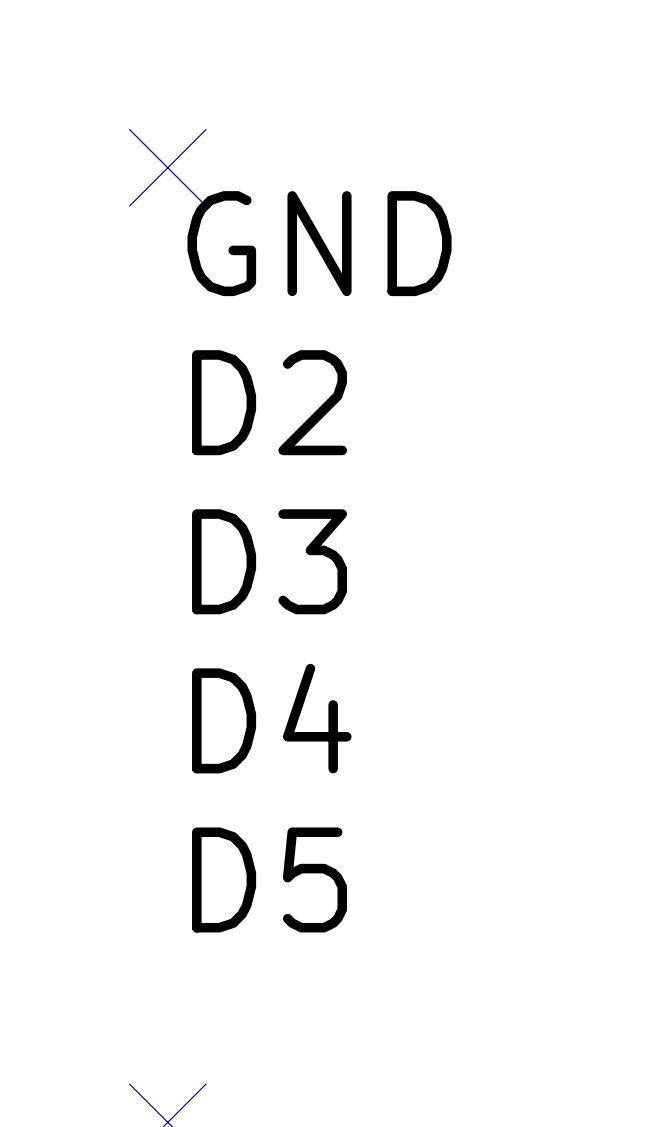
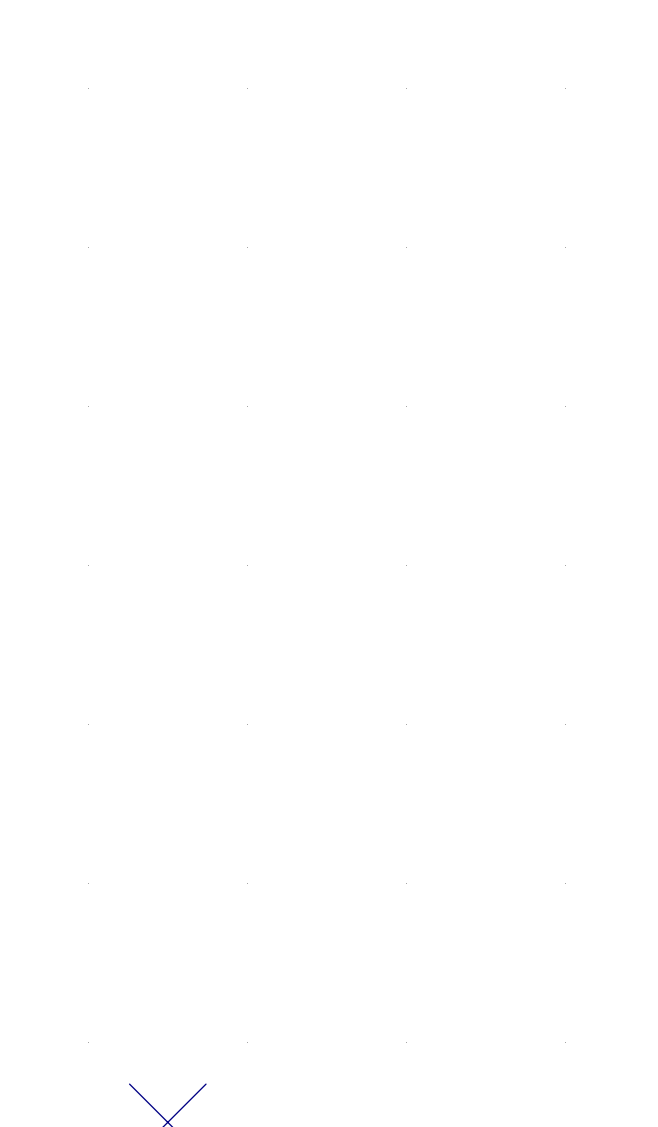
no-connect mark: (167, 167) -> none
label: GND (319, 243) -> none
label: D2 (269, 402) -> none
label: D3 (269, 561) -> none
label: D4 (271, 718) -> none
label: D5 (269, 879) -> none

